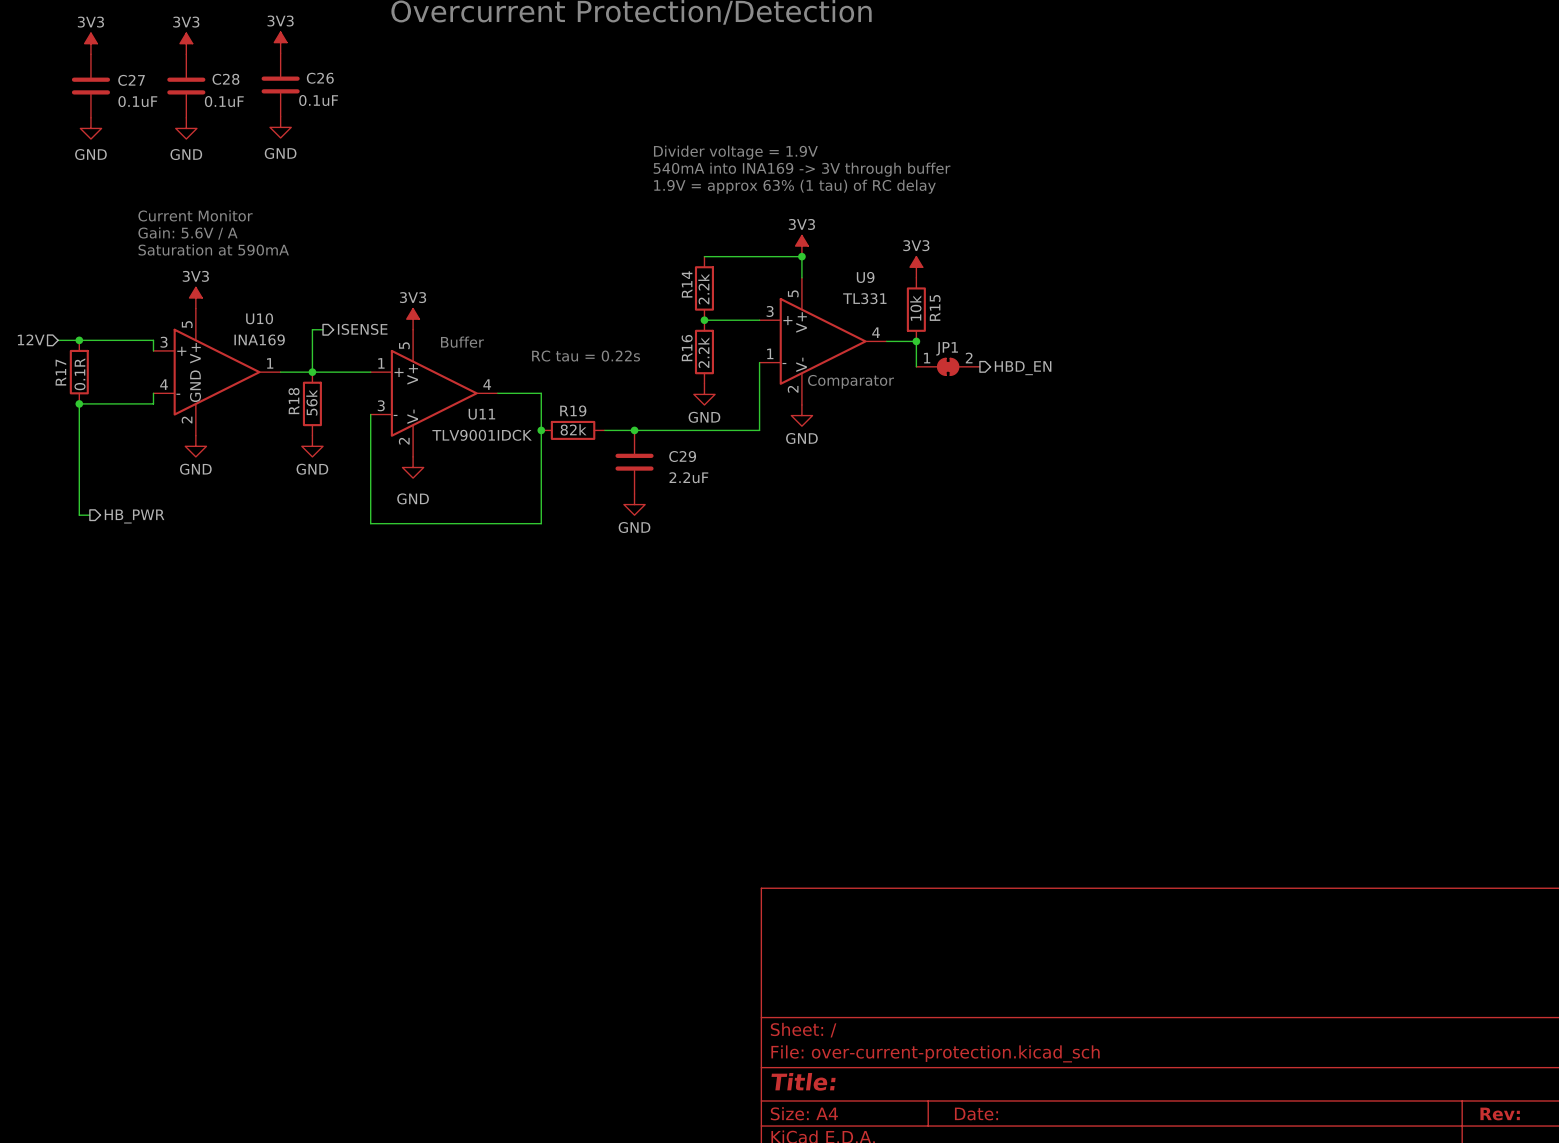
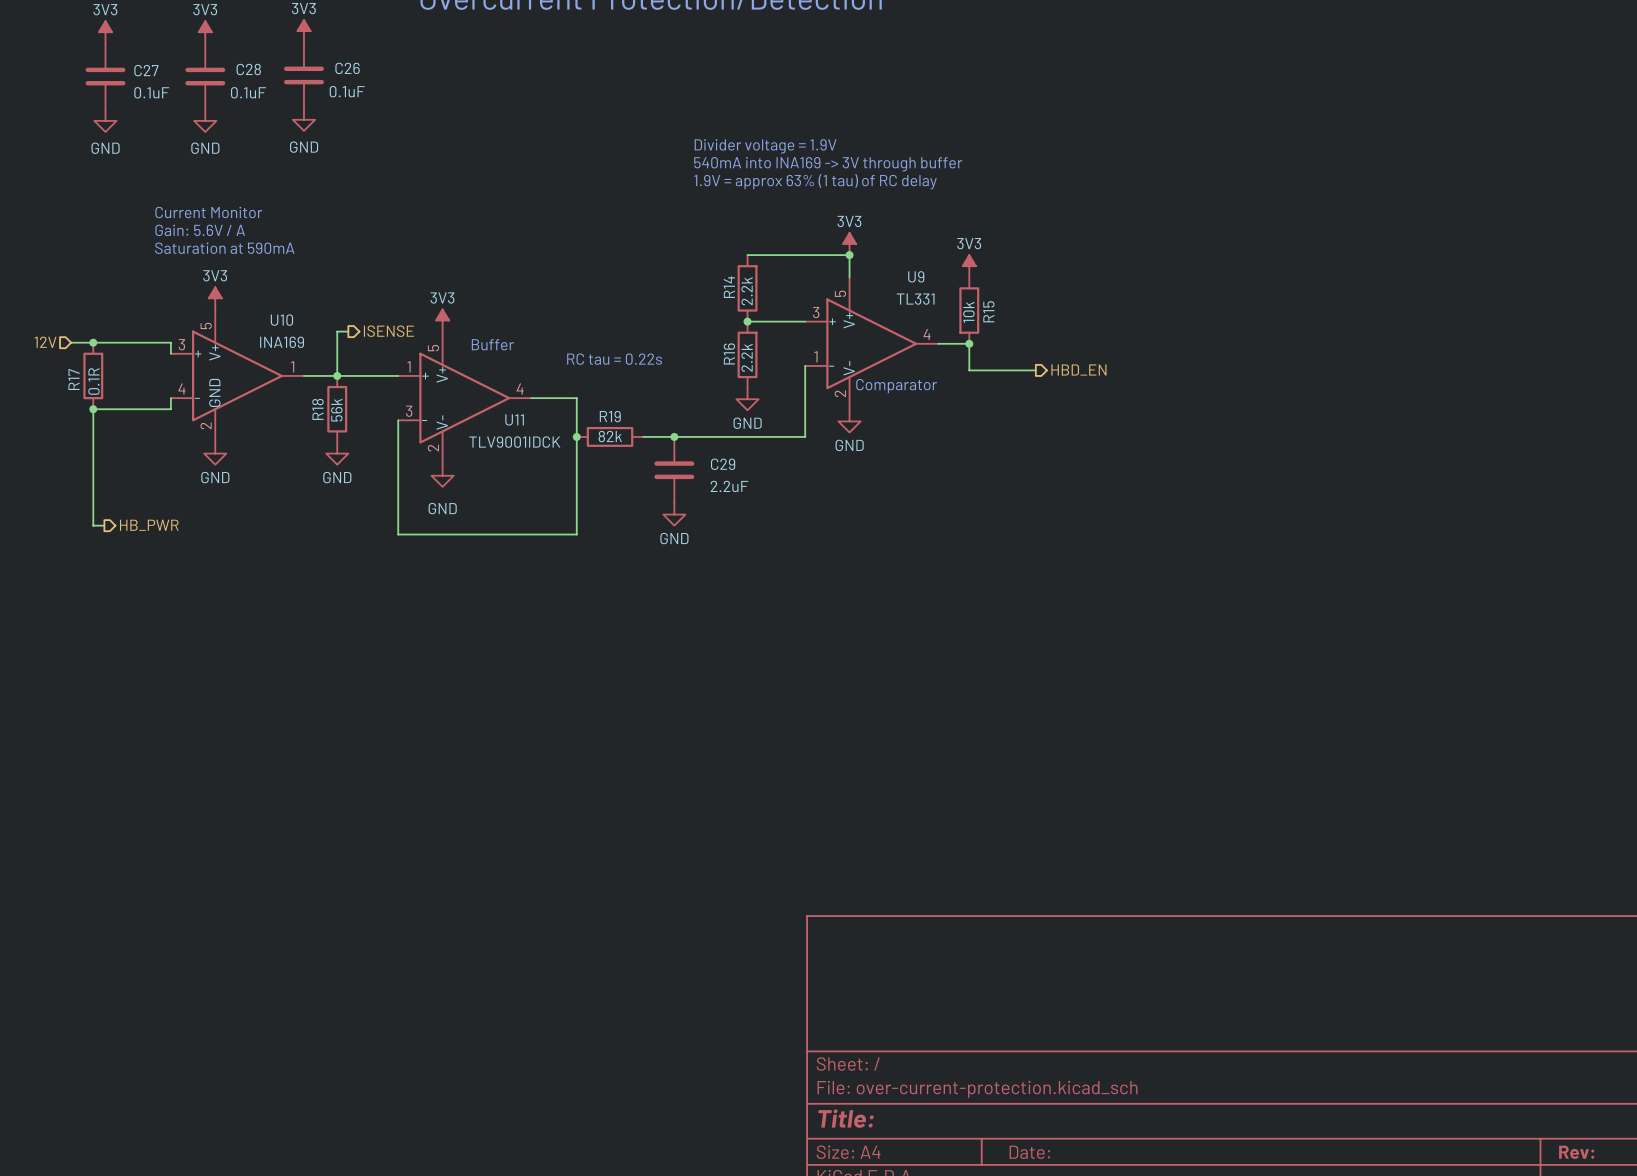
JP1: (948, 366) -> none

